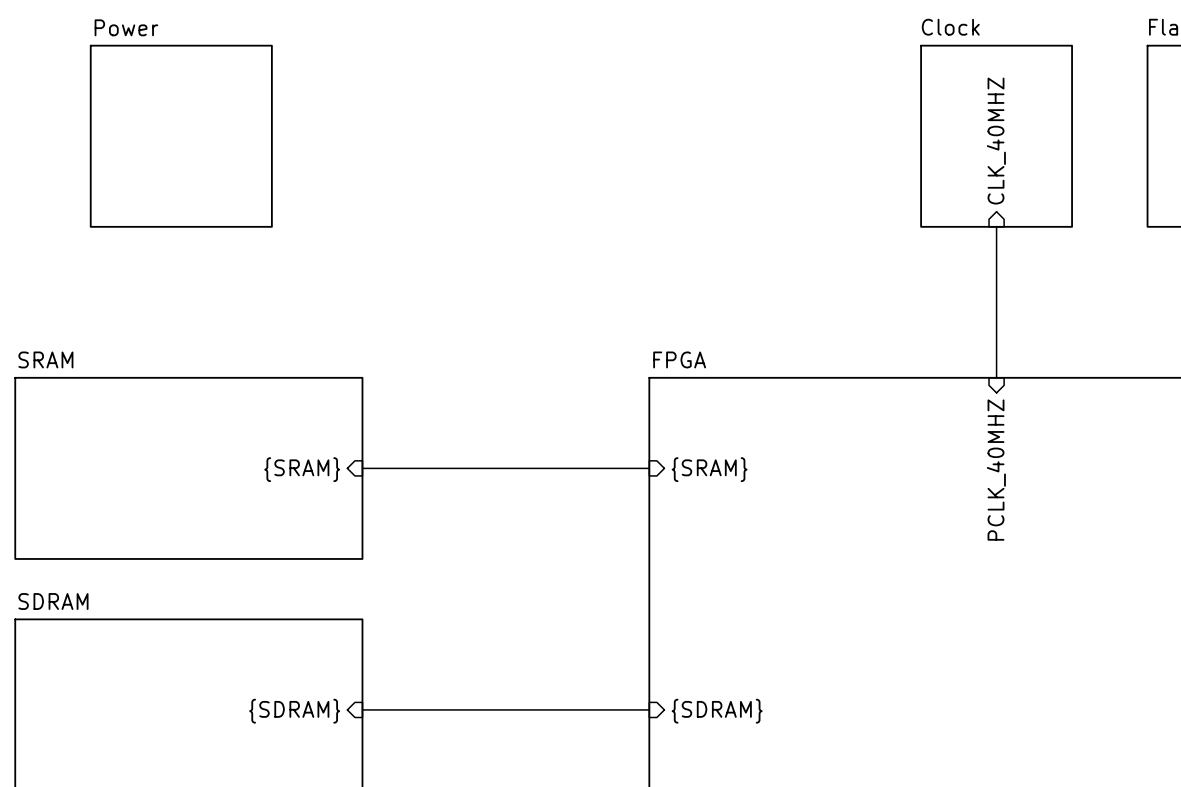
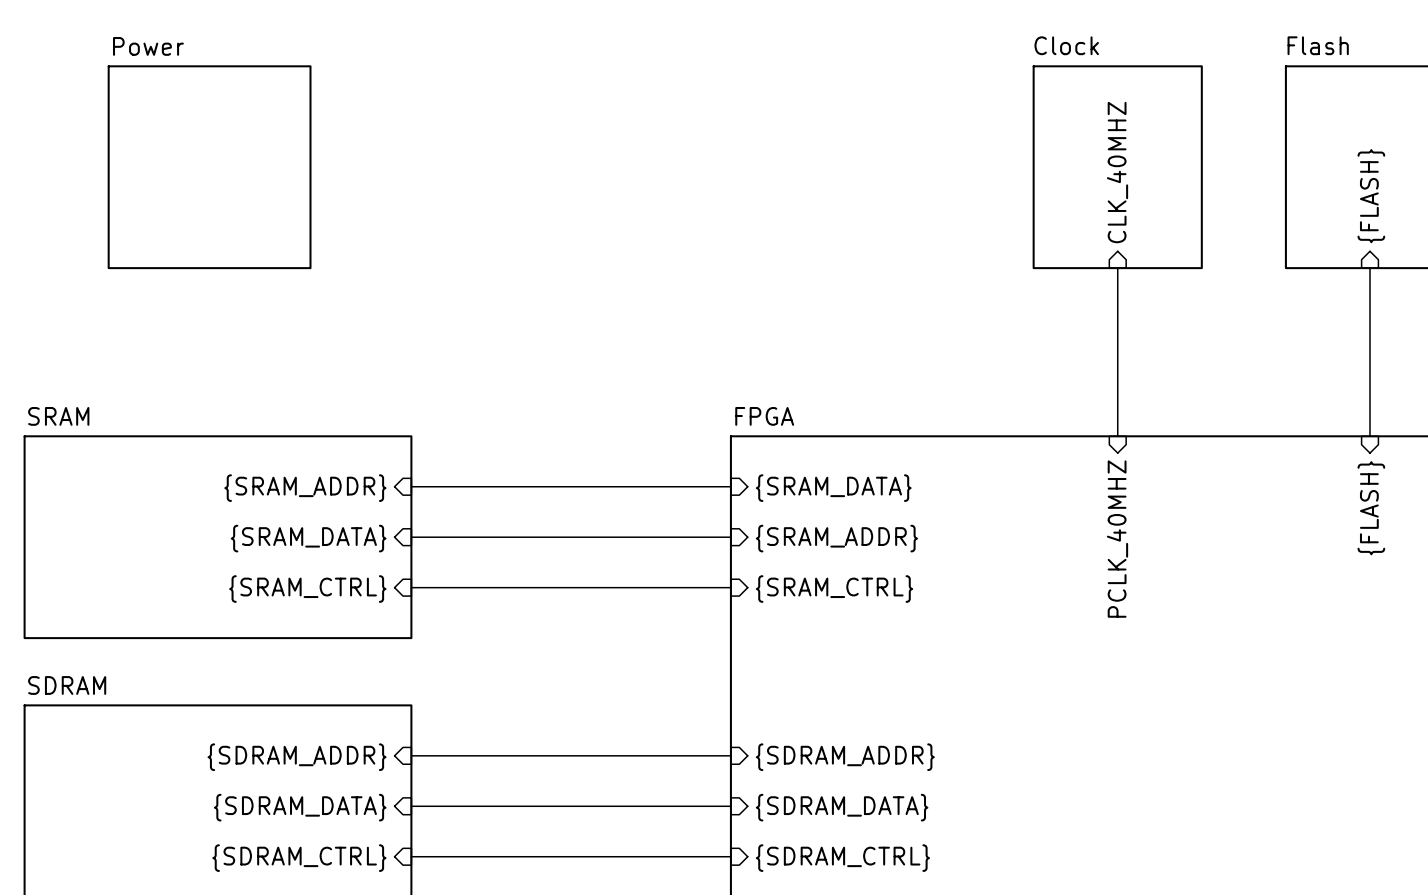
bus: none -> (411, 486) (730, 486)
sheet pin: none -> {SRAM_ADDR} (305, 488)
sheet pin: none -> {SRAM_DATA} (833, 488)
sheet pin: {SRAM} (302, 469) -> {SRAM_DATA} (308, 538)
sheet pin: {SRAM} (709, 469) -> {SRAM_ADDR} (836, 538)
bus: none -> (411, 587) (730, 587)
sheet pin: none -> {SRAM_CTRL} (307, 589)
sheet pin: none -> {SRAM_CTRL} (834, 589)
bus: none -> (411, 755) (730, 755)
sheet pin: none -> {SDRAM_ADDR} (297, 757)
sheet pin: none -> {SDRAM_ADDR} (845, 757)
sheet pin: {SDRAM} (294, 711) -> {SDRAM_DATA} (300, 807)
sheet pin: {SDRAM} (717, 711) -> {SDRAM_DATA} (842, 807)
bus: none -> (411, 856) (730, 856)
sheet pin: none -> {SDRAM_CTRL} (299, 858)
sheet pin: none -> {SDRAM_CTRL} (842, 858)

